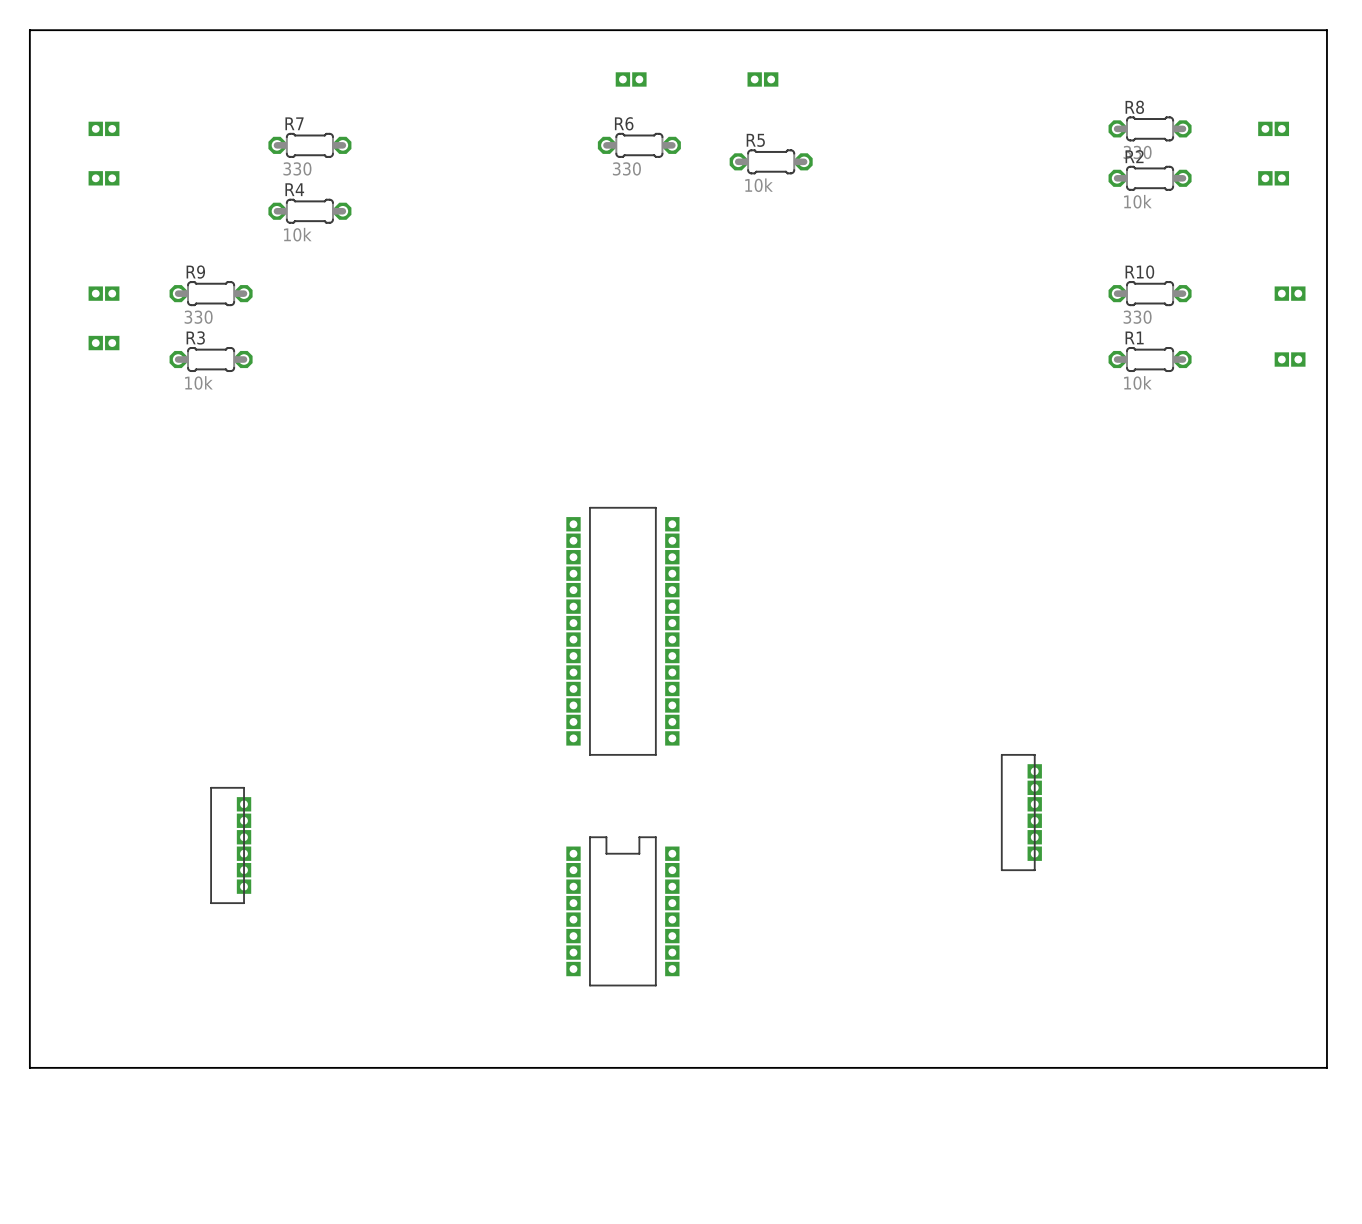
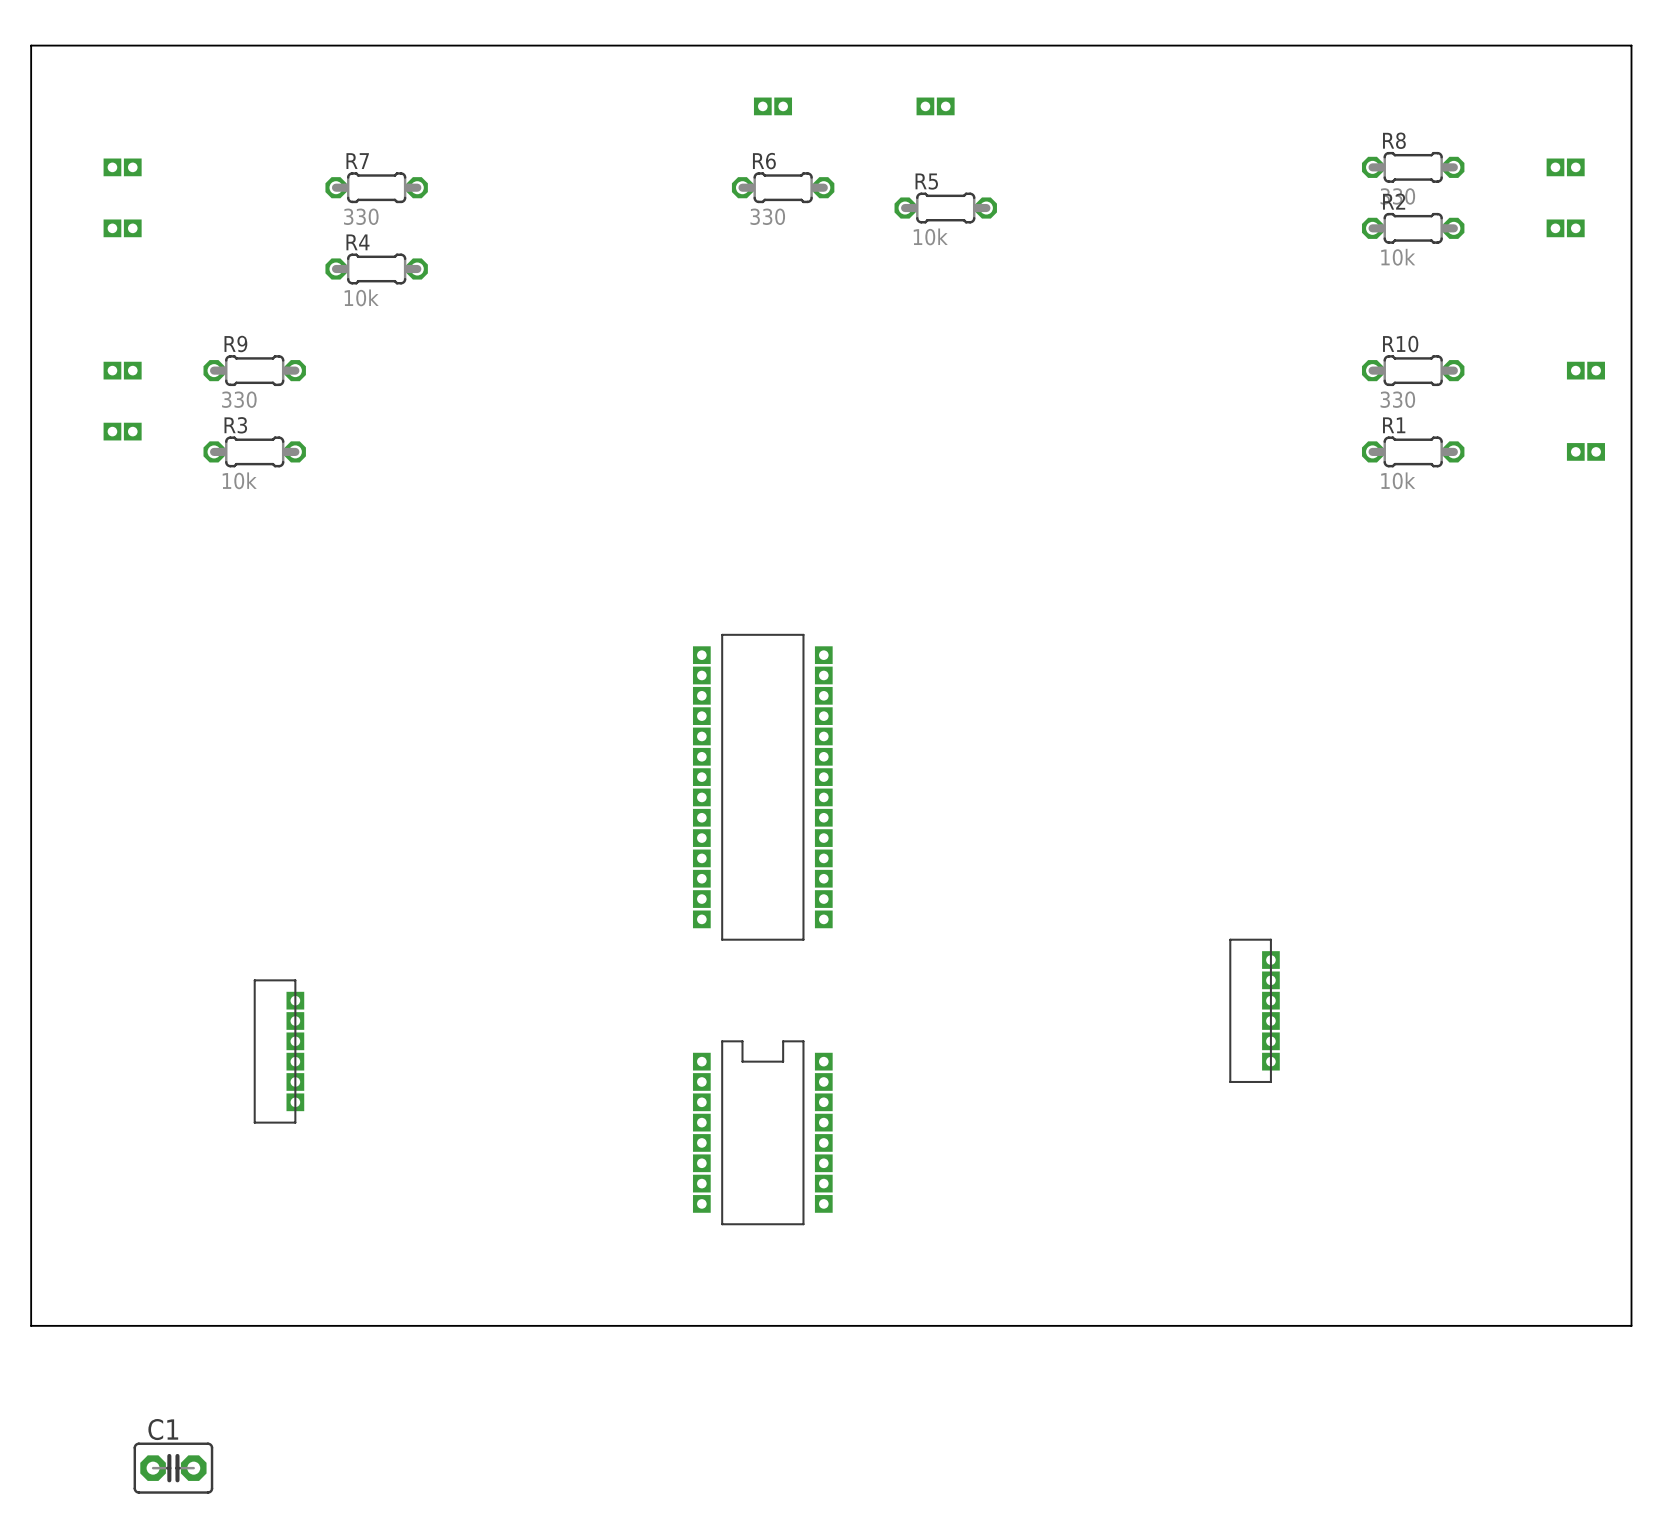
C1: none -> (173, 1468)

